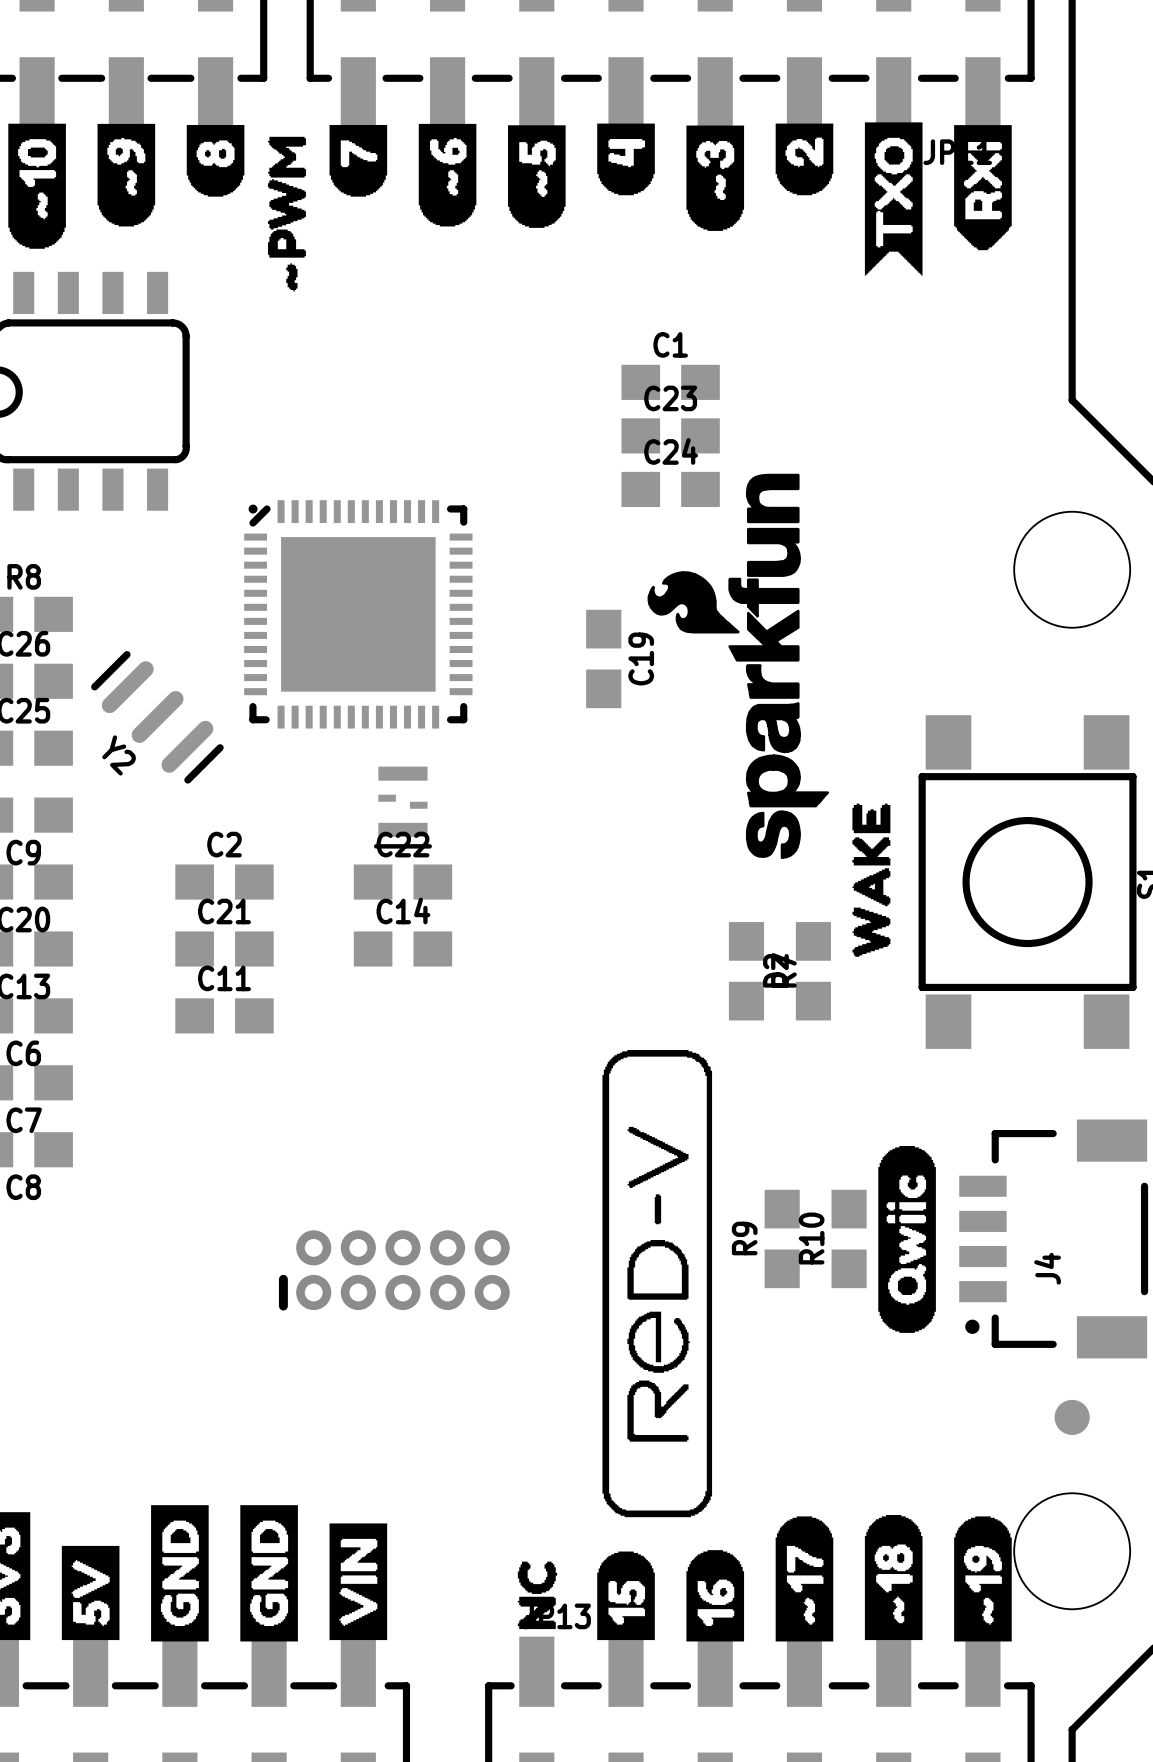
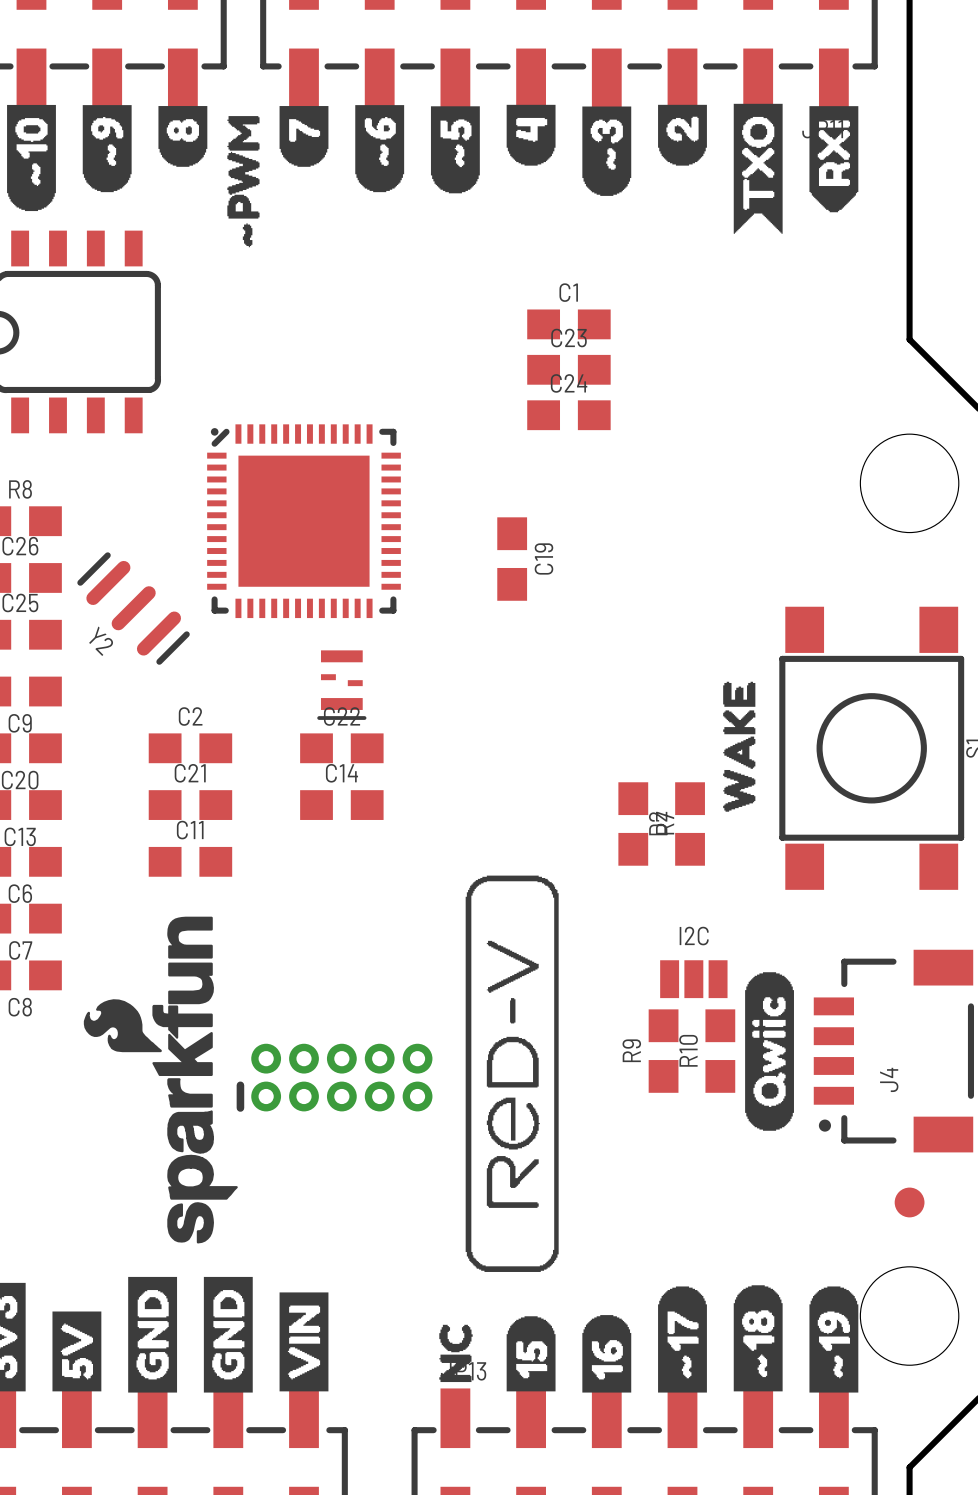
drawing position: (738, 666) -> (160, 1080)
I2C: none -> (693, 979)
drawing position: (657, 1283) -> (512, 1073)

